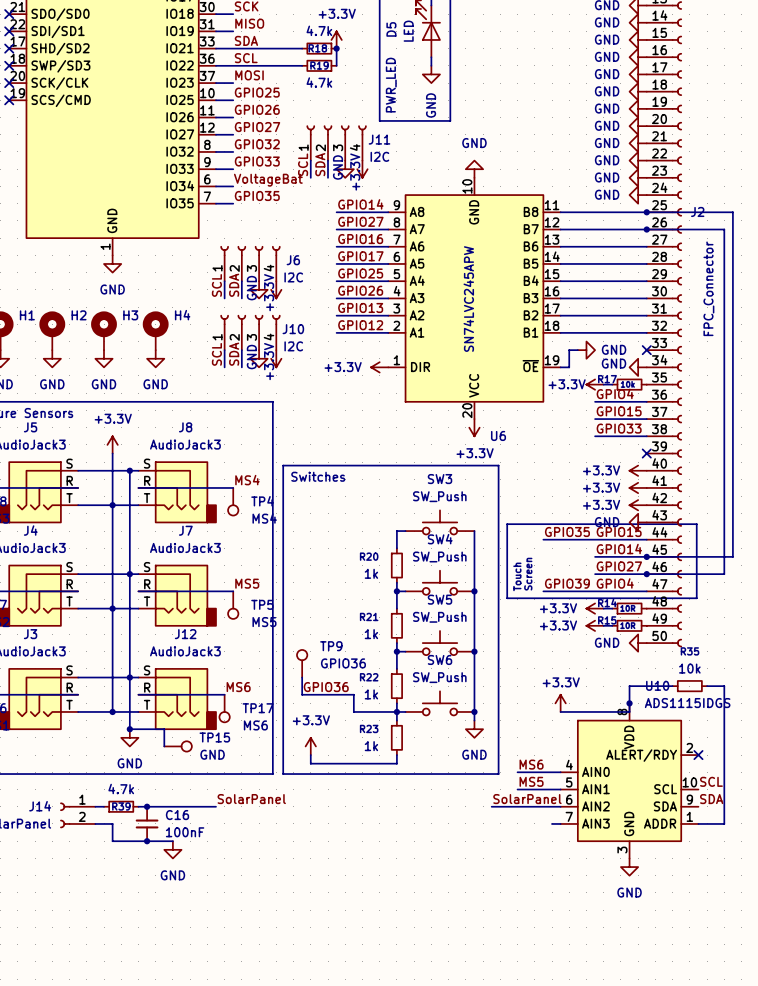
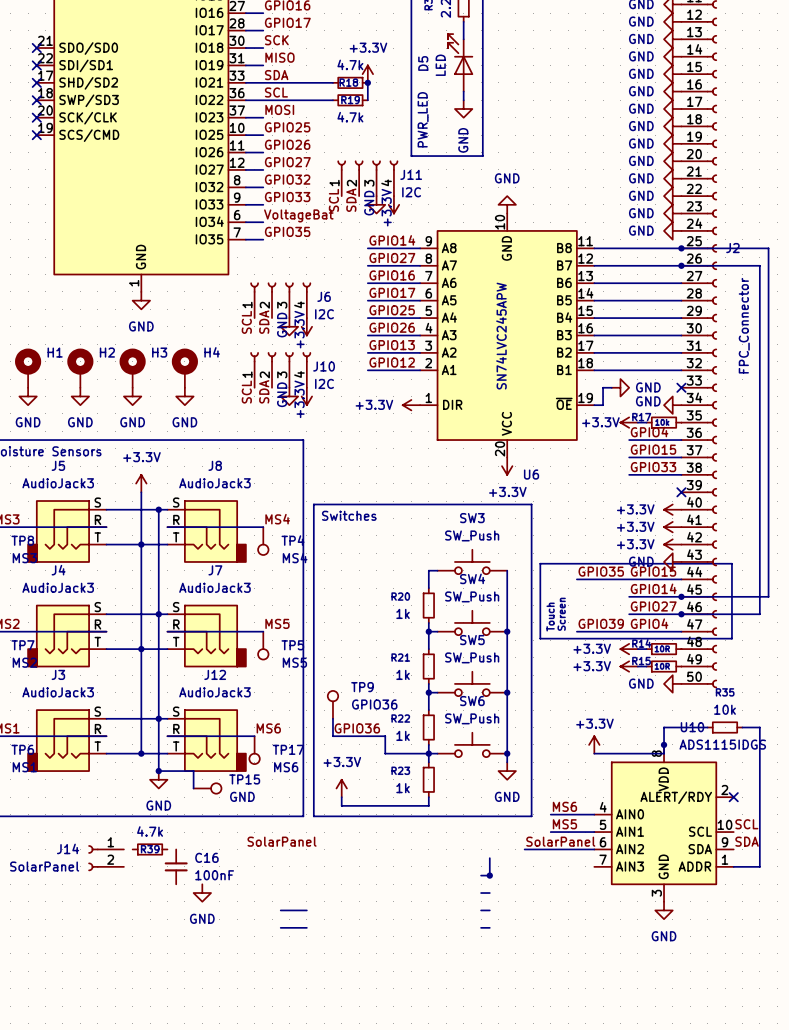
wire: (310, 160) (310, 177) -> none
wire: (328, 160) (328, 177) -> none
wire: (224, 281) (224, 298) -> none
wire: (241, 281) (241, 298) -> none
wire: (224, 350) (224, 367) -> none
wire: (241, 350) (241, 367) -> none
wire: (95, 806) (104, 806) -> none
wire: (138, 806) (216, 806) -> none
junction: (147, 806) -> none
wire: none -> (489, 858) (489, 875) (481, 875)
wire: (95, 823) (112, 823) (112, 841) (172, 841) -> none
wire: (552, 823) (560, 823) -> (481, 893) (489, 893)
junction: none -> (489, 875)
junction: (147, 841) -> none
wire: none -> (280, 910) (306, 910)
wire: none -> (481, 910) (489, 910)
wire: none -> (280, 927) (306, 927)
wire: none -> (481, 927) (489, 927)

